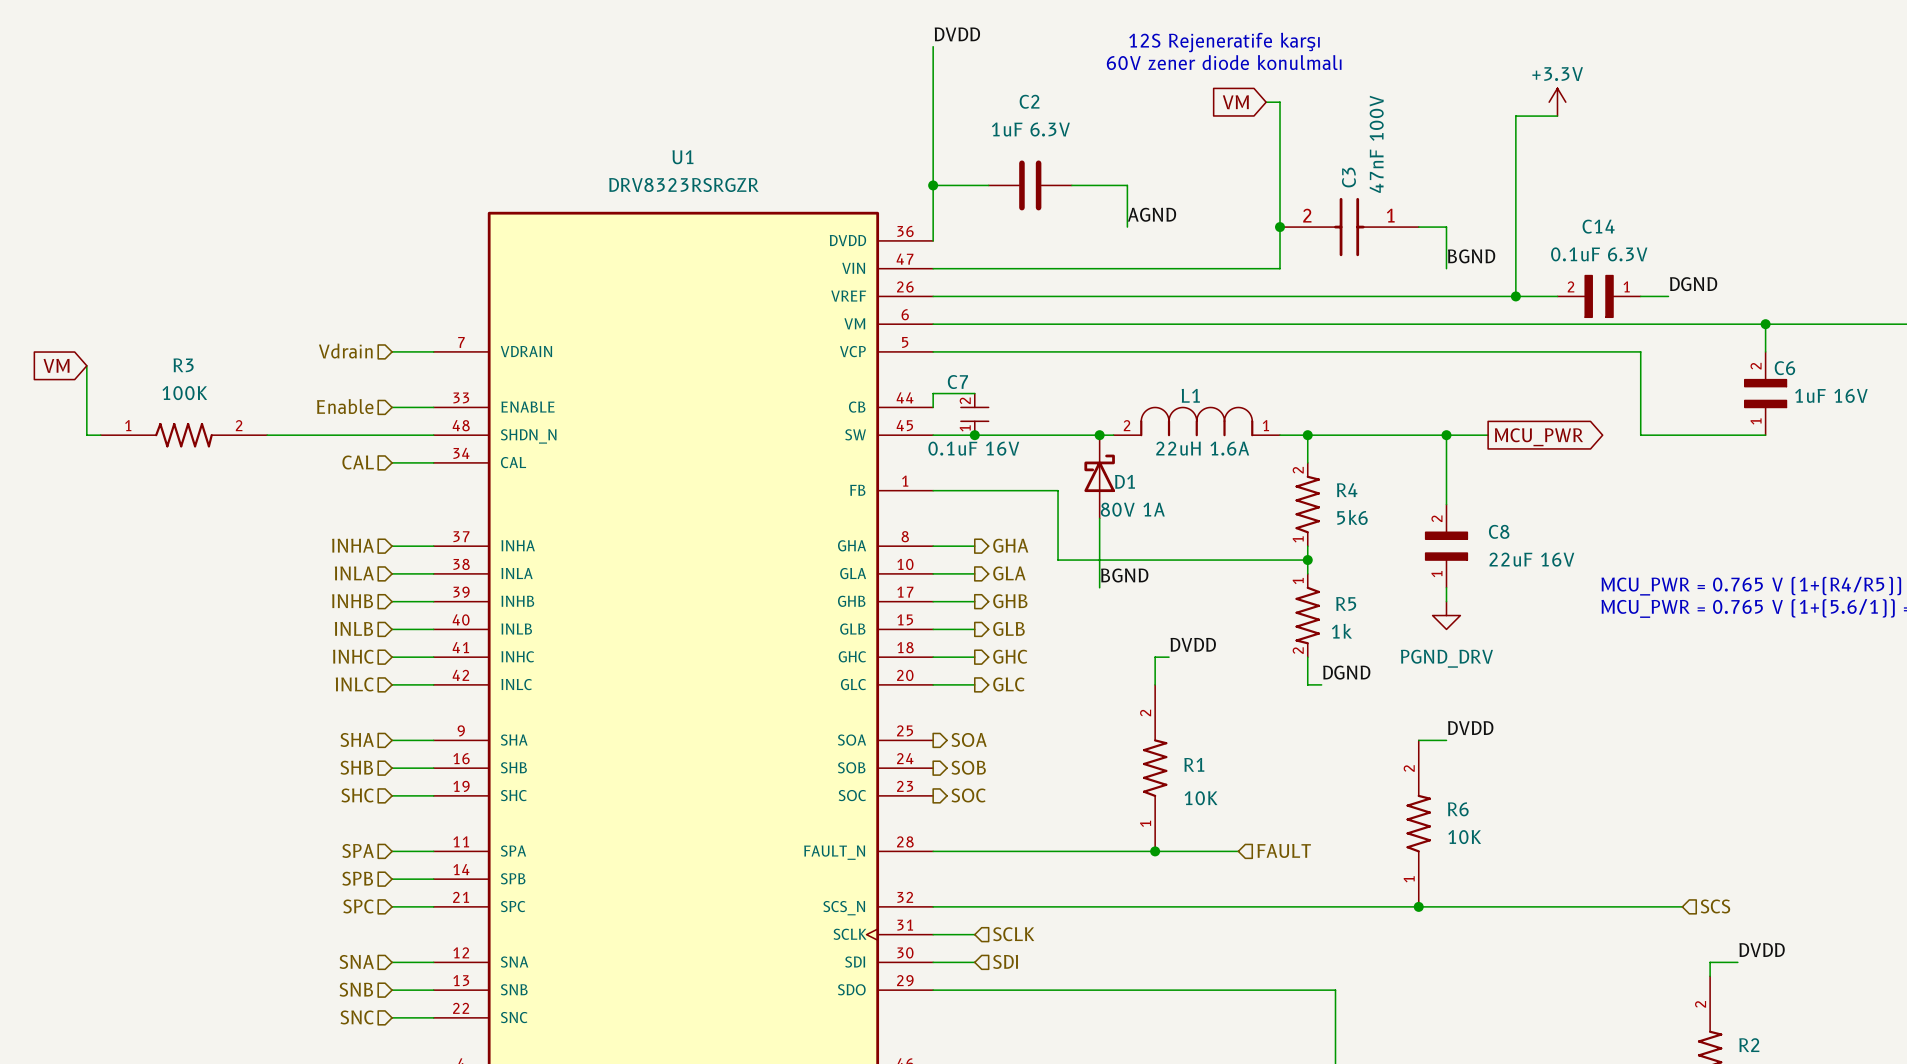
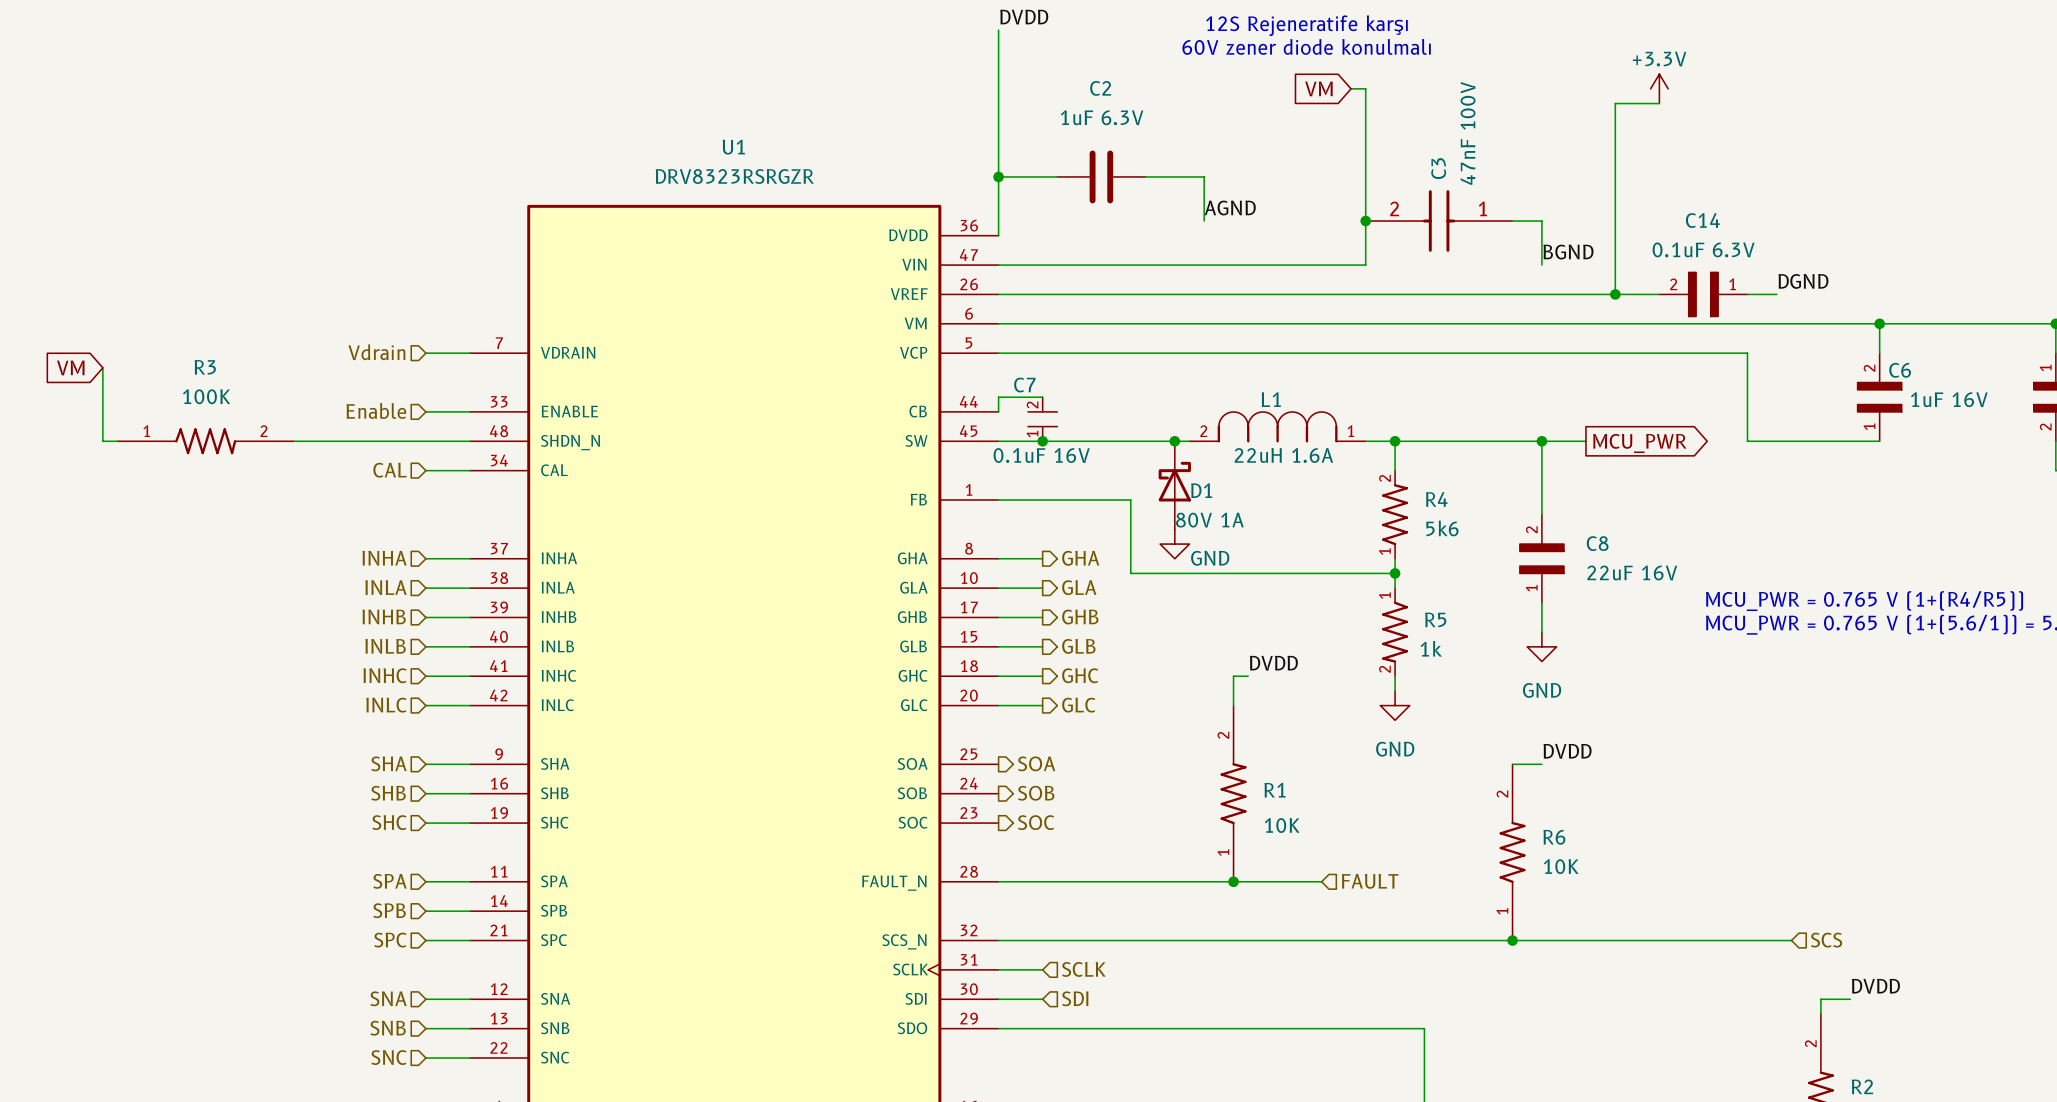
wire: (1099, 518) (1099, 587) -> none
power symbol: none -> GND (1174, 544)
label: BGND (1124, 575) -> none
power symbol: PGND_DRV (1446, 615) -> none
power symbol: none -> GND (1541, 646)
label: DGND (1346, 672) -> none
power symbol: none -> GND (1395, 705)

